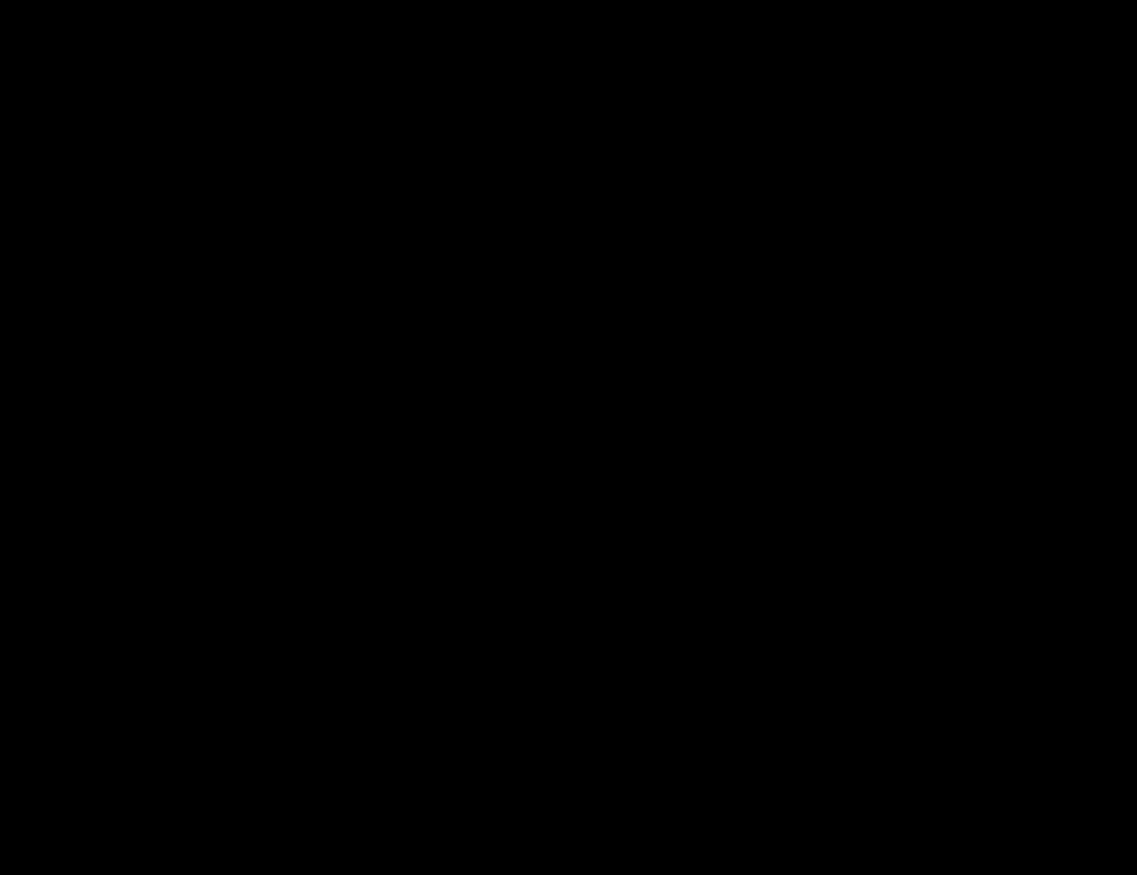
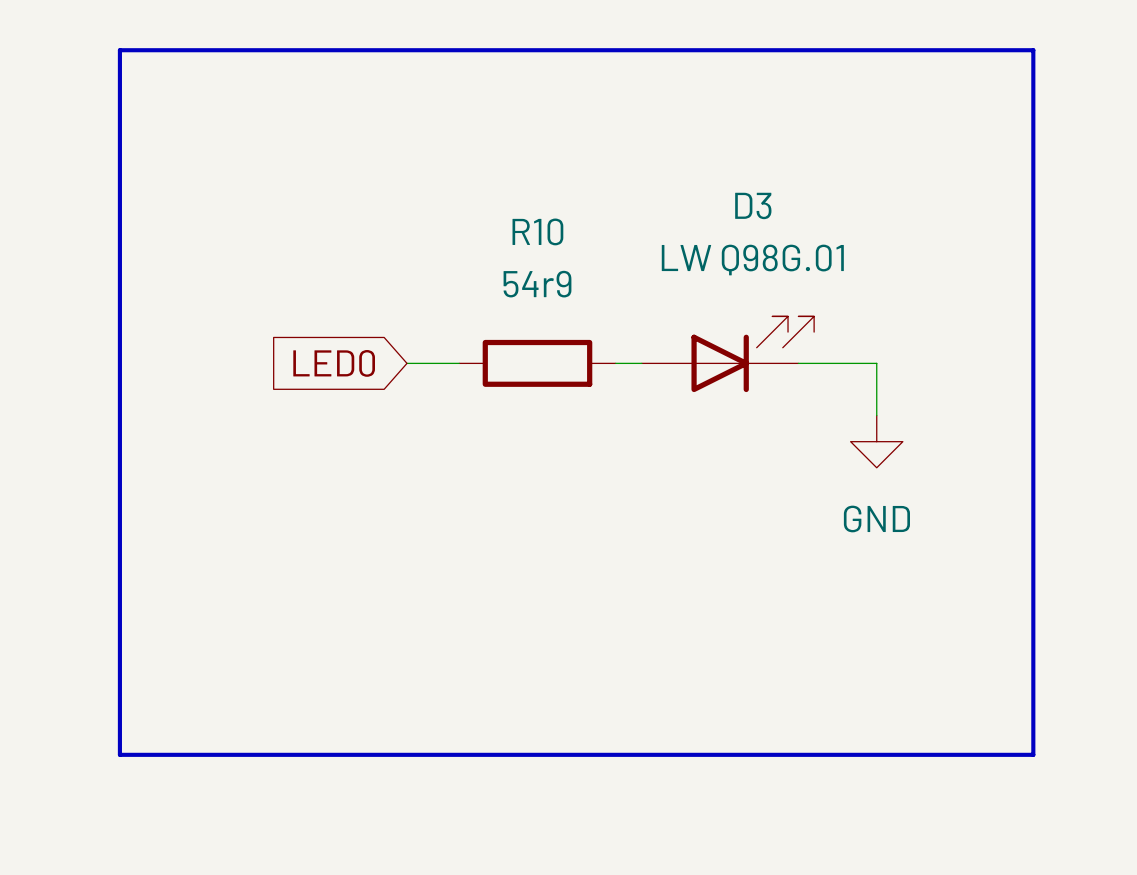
line: none -> (119, 50) (1033, 50) (1033, 754) (119, 754) (119, 50)
D3: none -> LW Q98G.01 (727, 354)
global label: none -> LED0 (334, 363)
wire: none -> (406, 363) (459, 363)
R10: none -> 54r9 (537, 363)
wire: none -> (615, 363) (641, 363)
wire: none -> (798, 363) (876, 363) (876, 415)
power symbol: none -> GND (876, 441)

